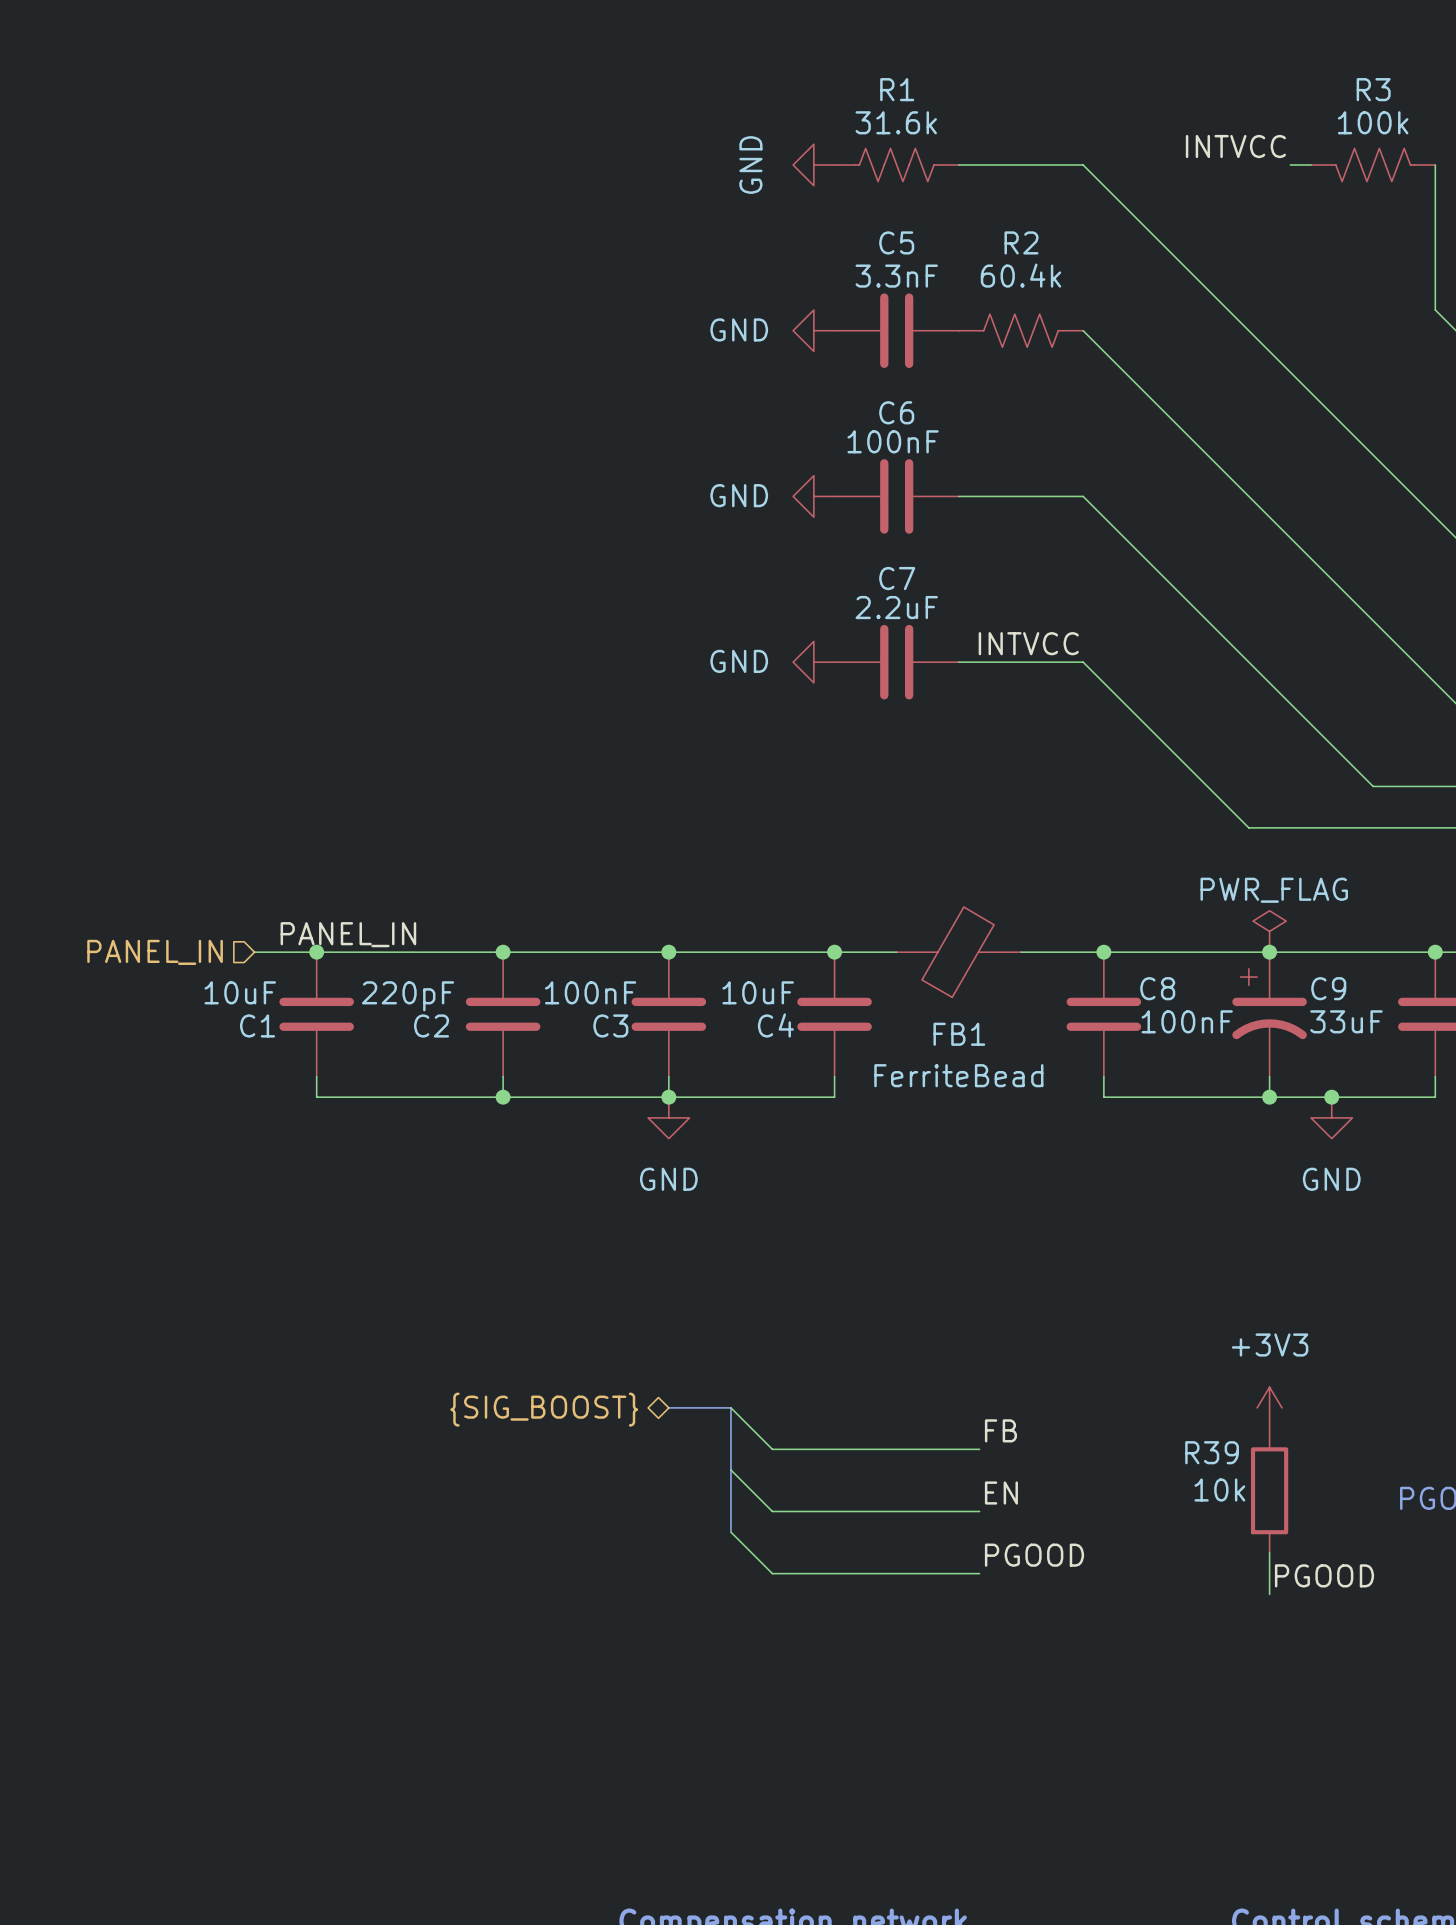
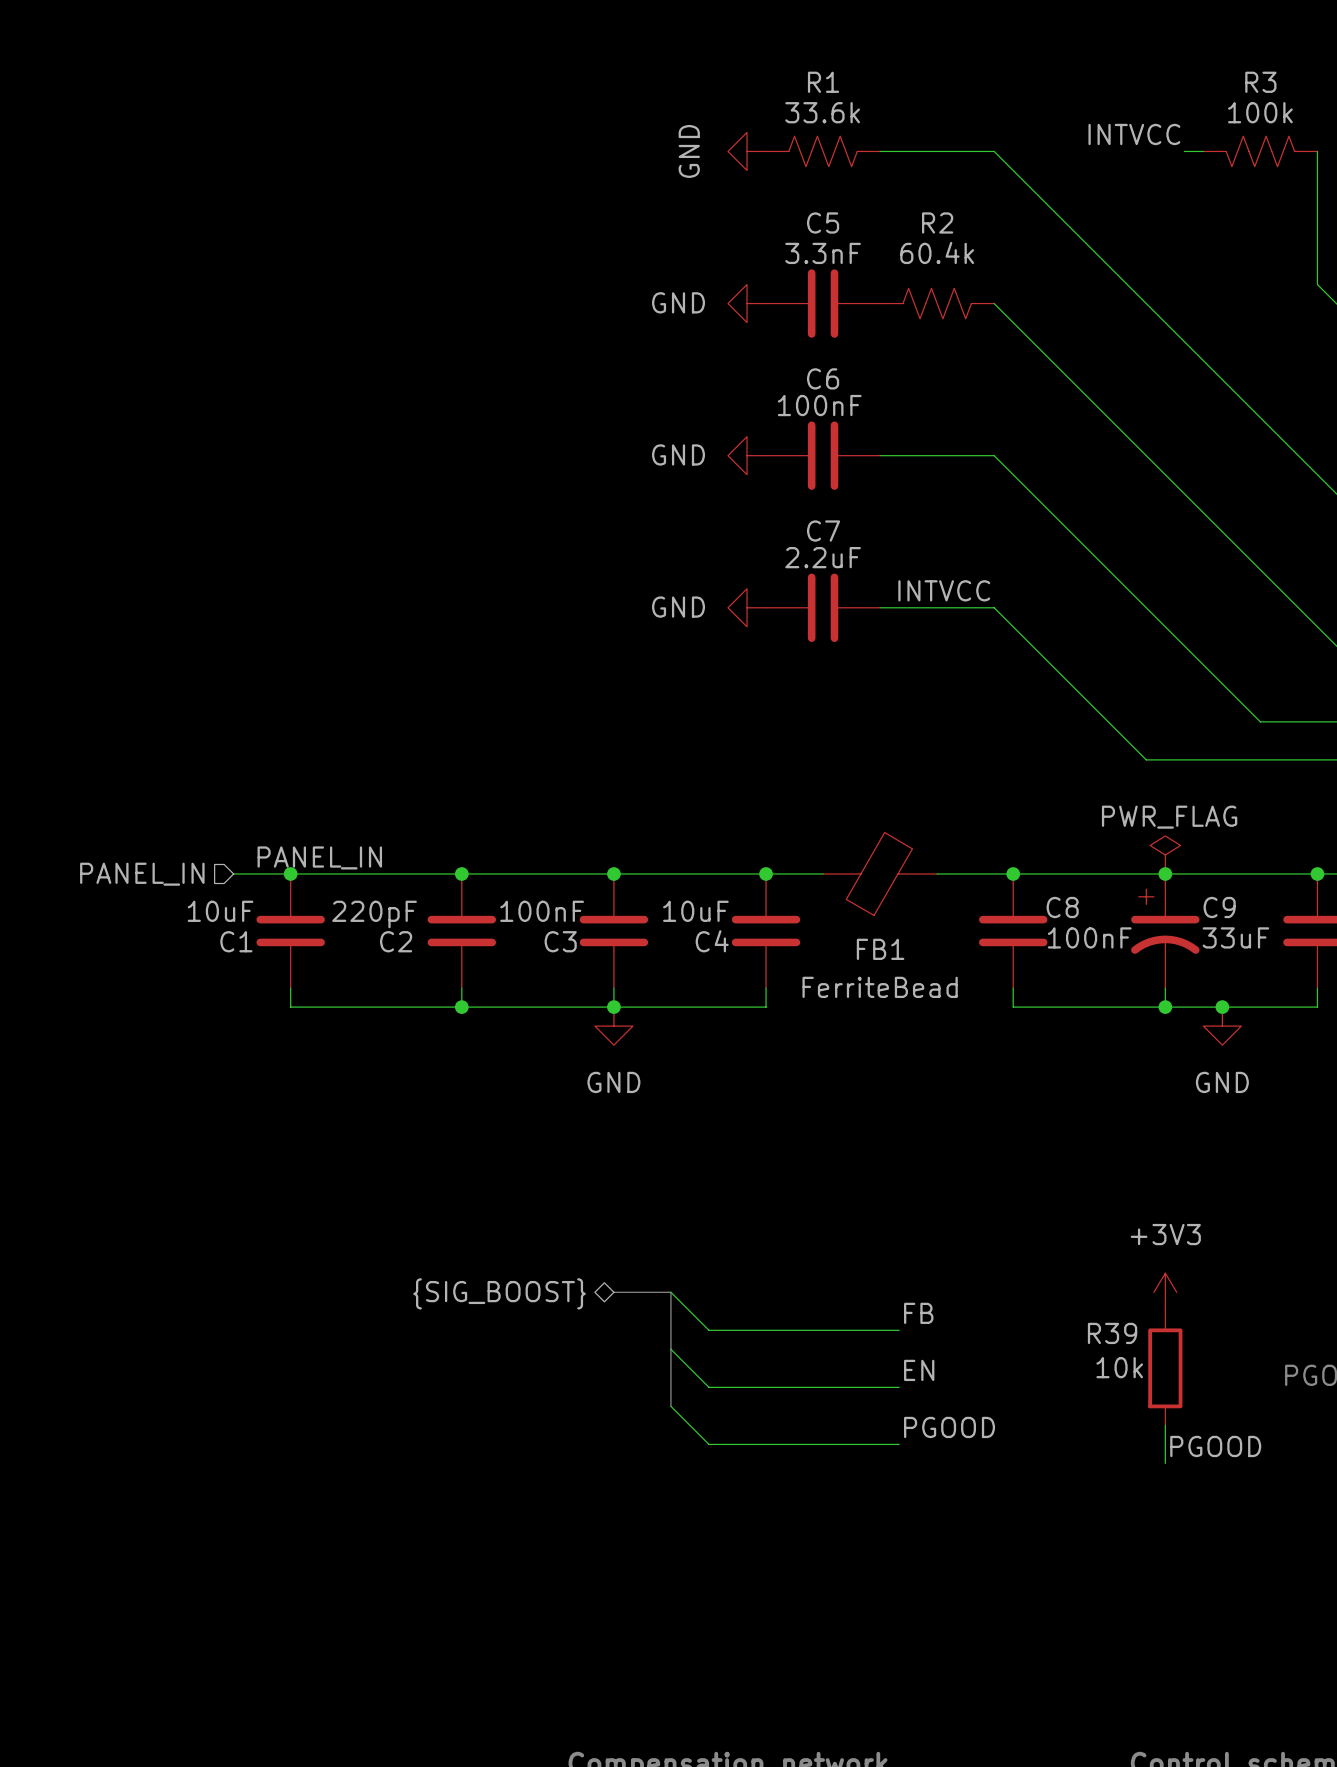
R1 value: 31.6k (896, 122) -> 33.6k (822, 112)

